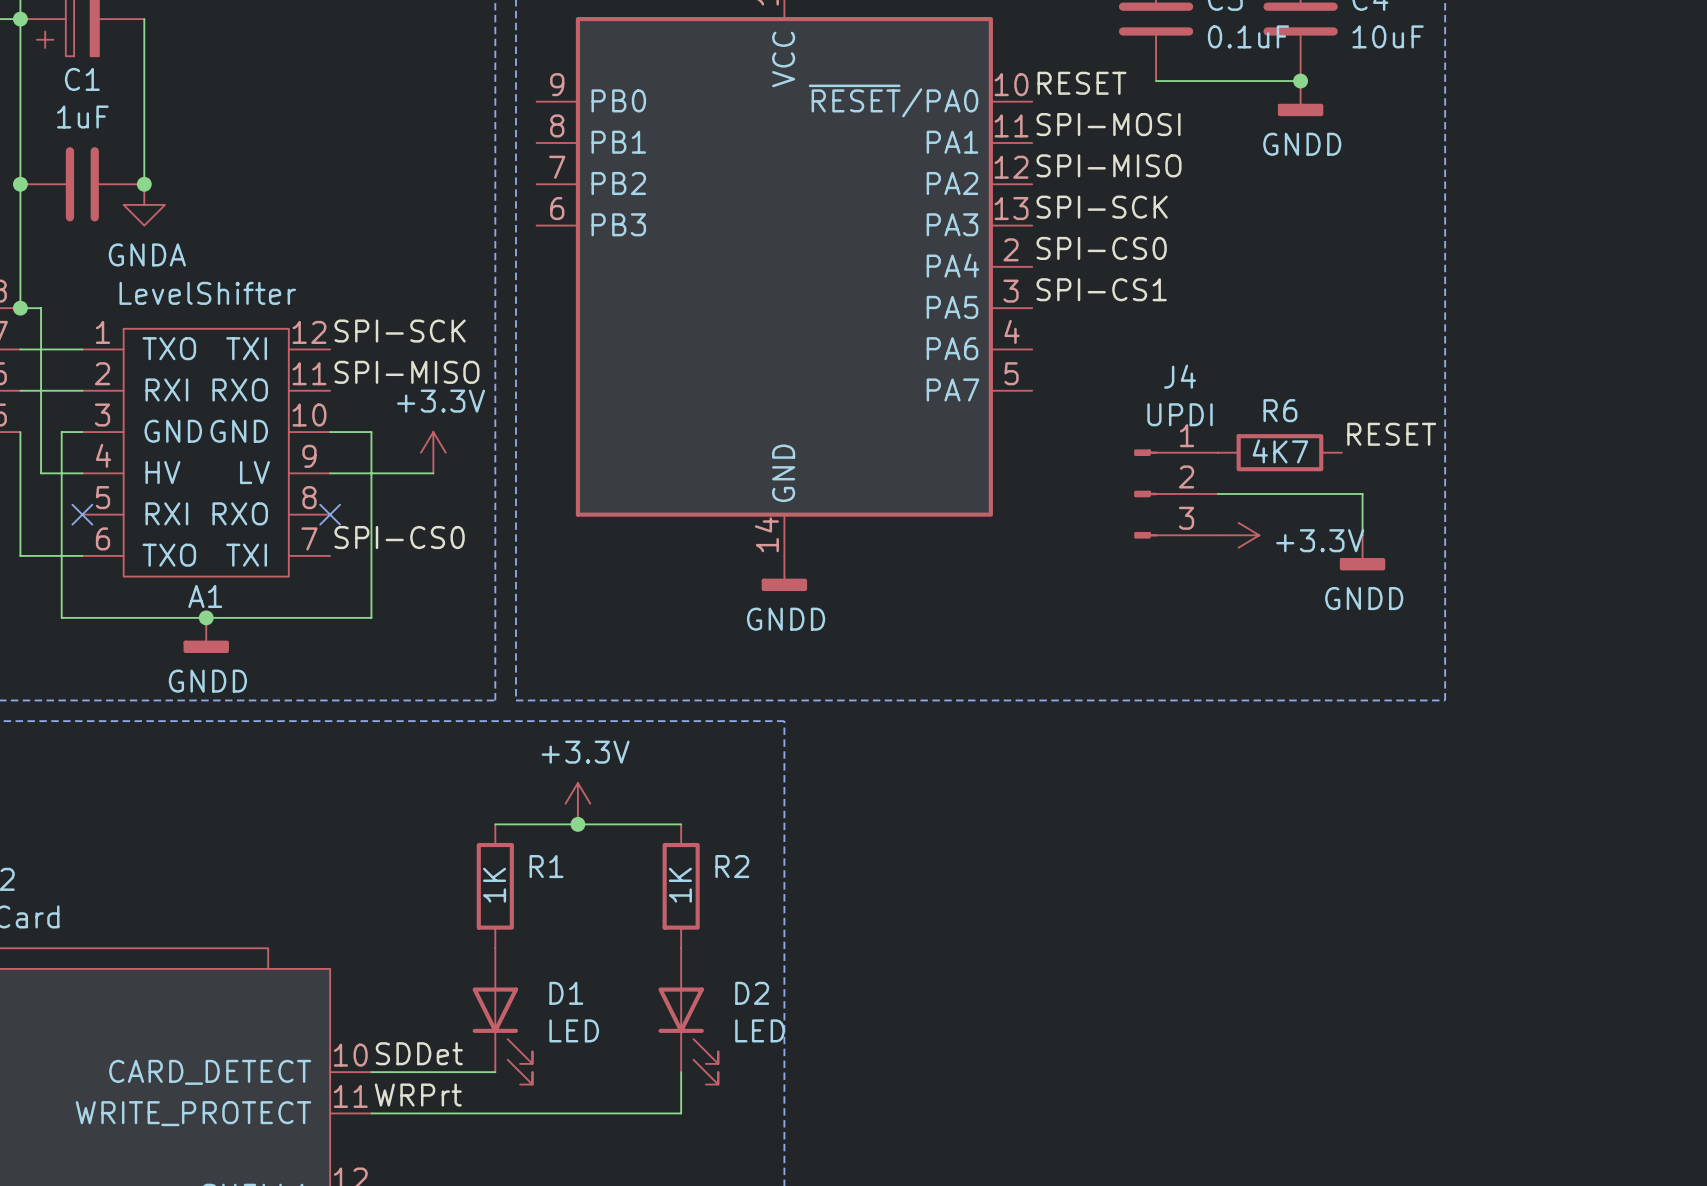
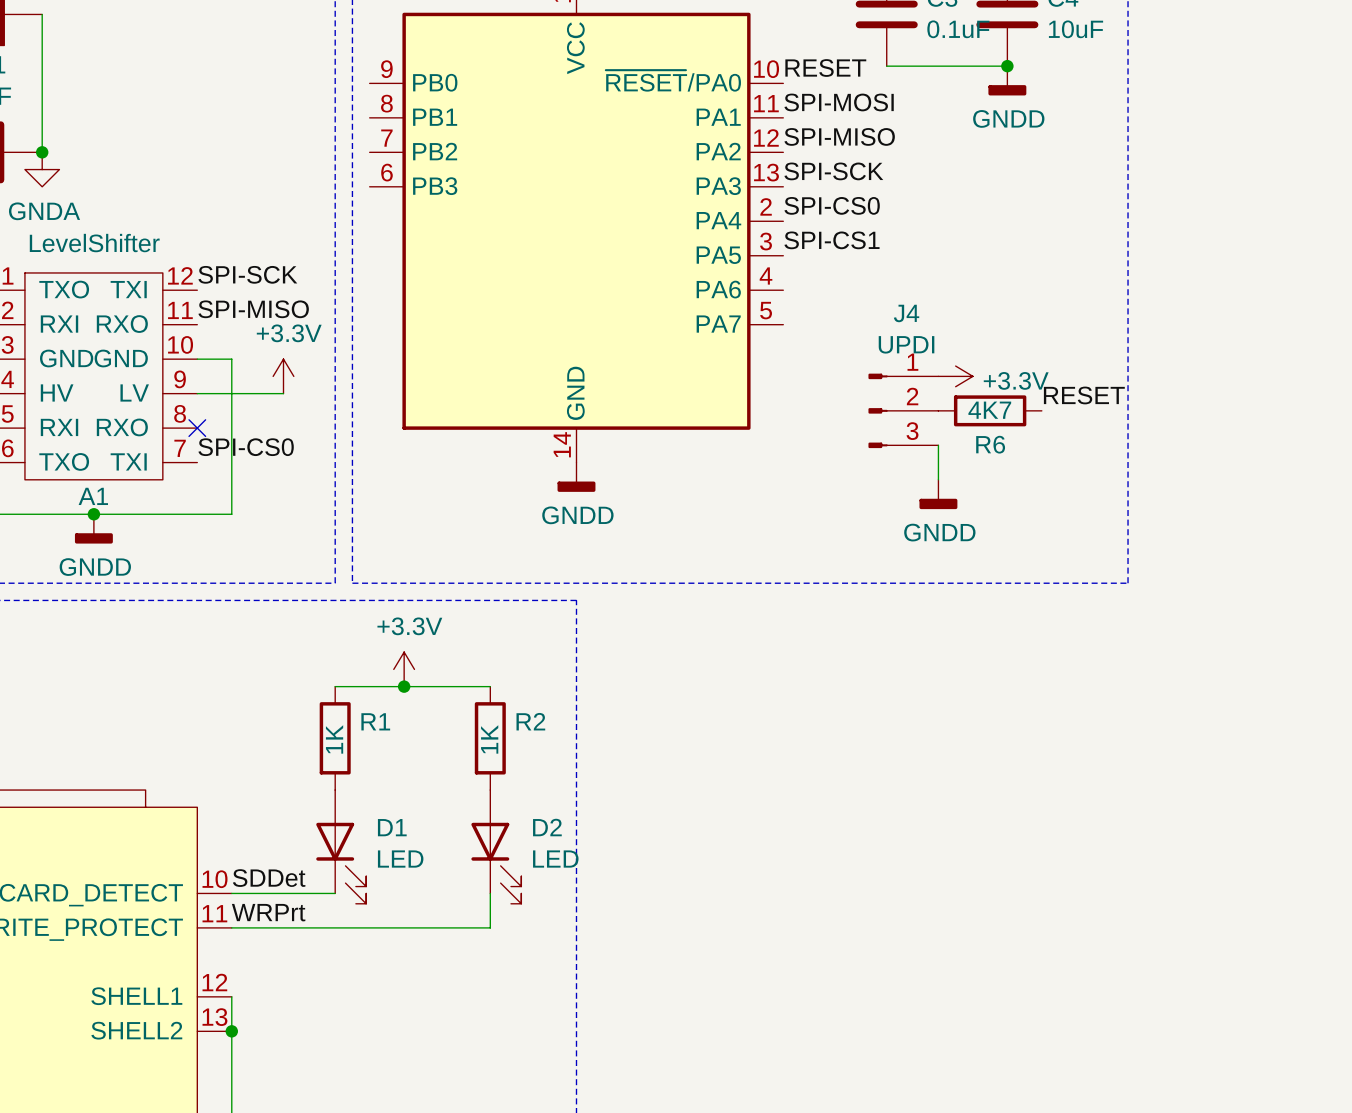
R6 name position: R6 (1280, 410) -> R6 (990, 444)
label position: RESET (1391, 434) -> RESET (1084, 395)
R6 position: (1279, 452) -> (990, 410)
wire: (1218, 493) (1362, 493) (1362, 535) -> none
wire: none -> (938, 445) (938, 479)
power symbol position: +3.3V (1238, 535) -> +3.3V (955, 376)
power symbol position: GNDD (1362, 552) -> GNDD (938, 494)

